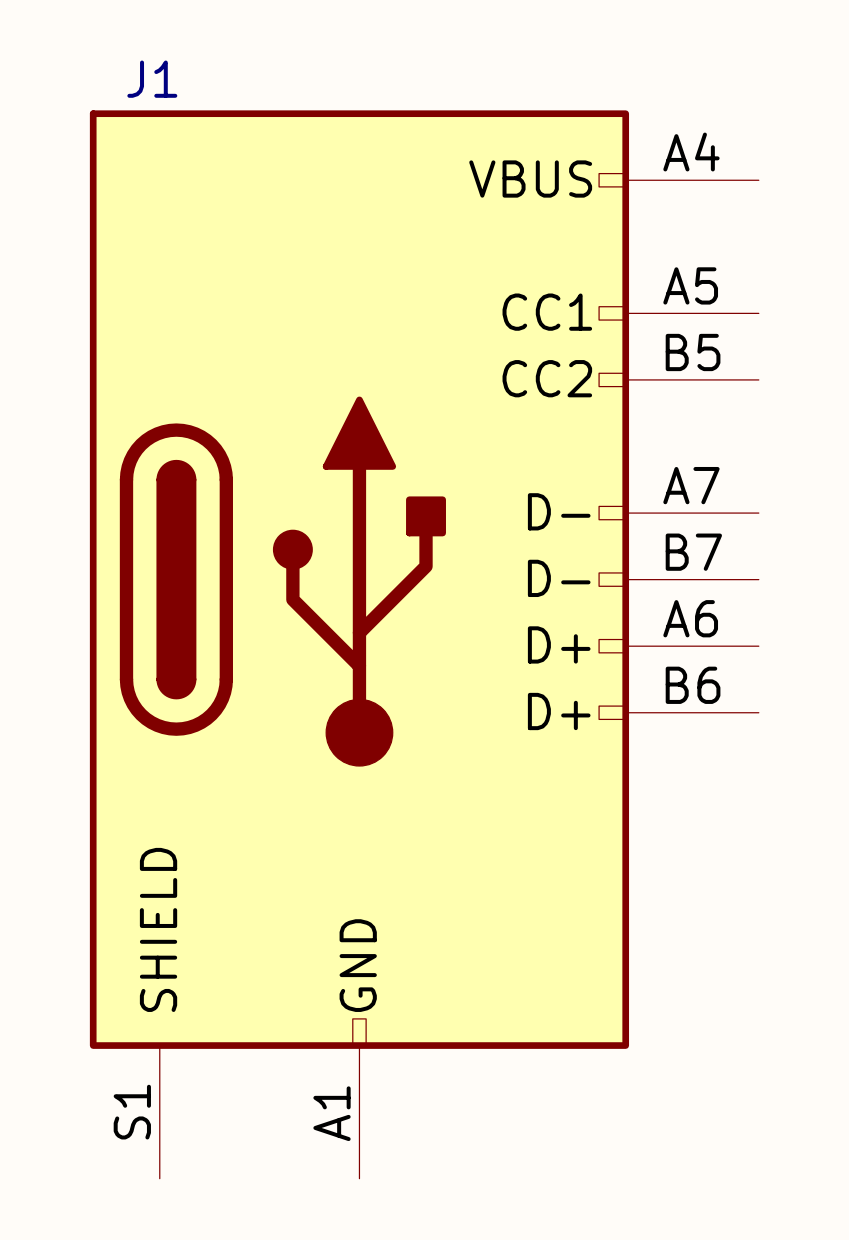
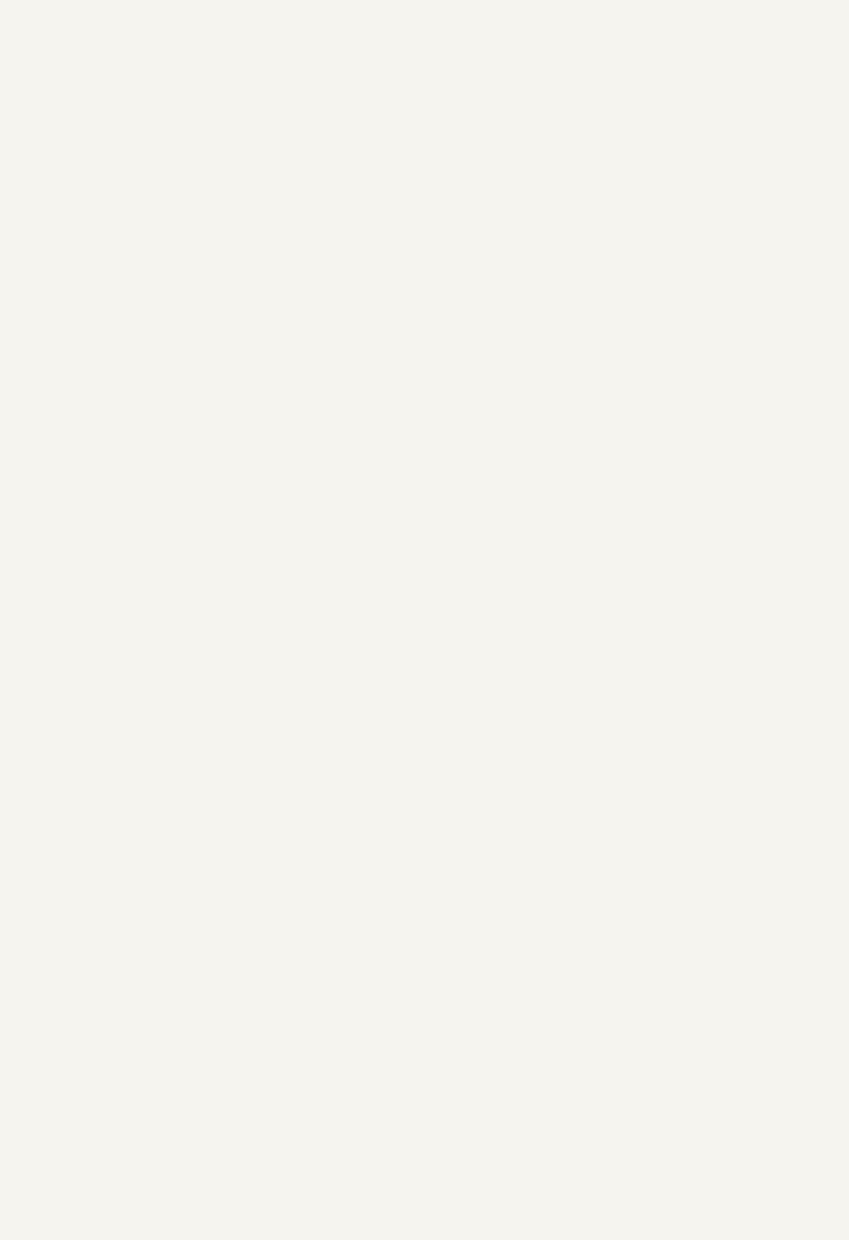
J1: (424, 644) -> none

